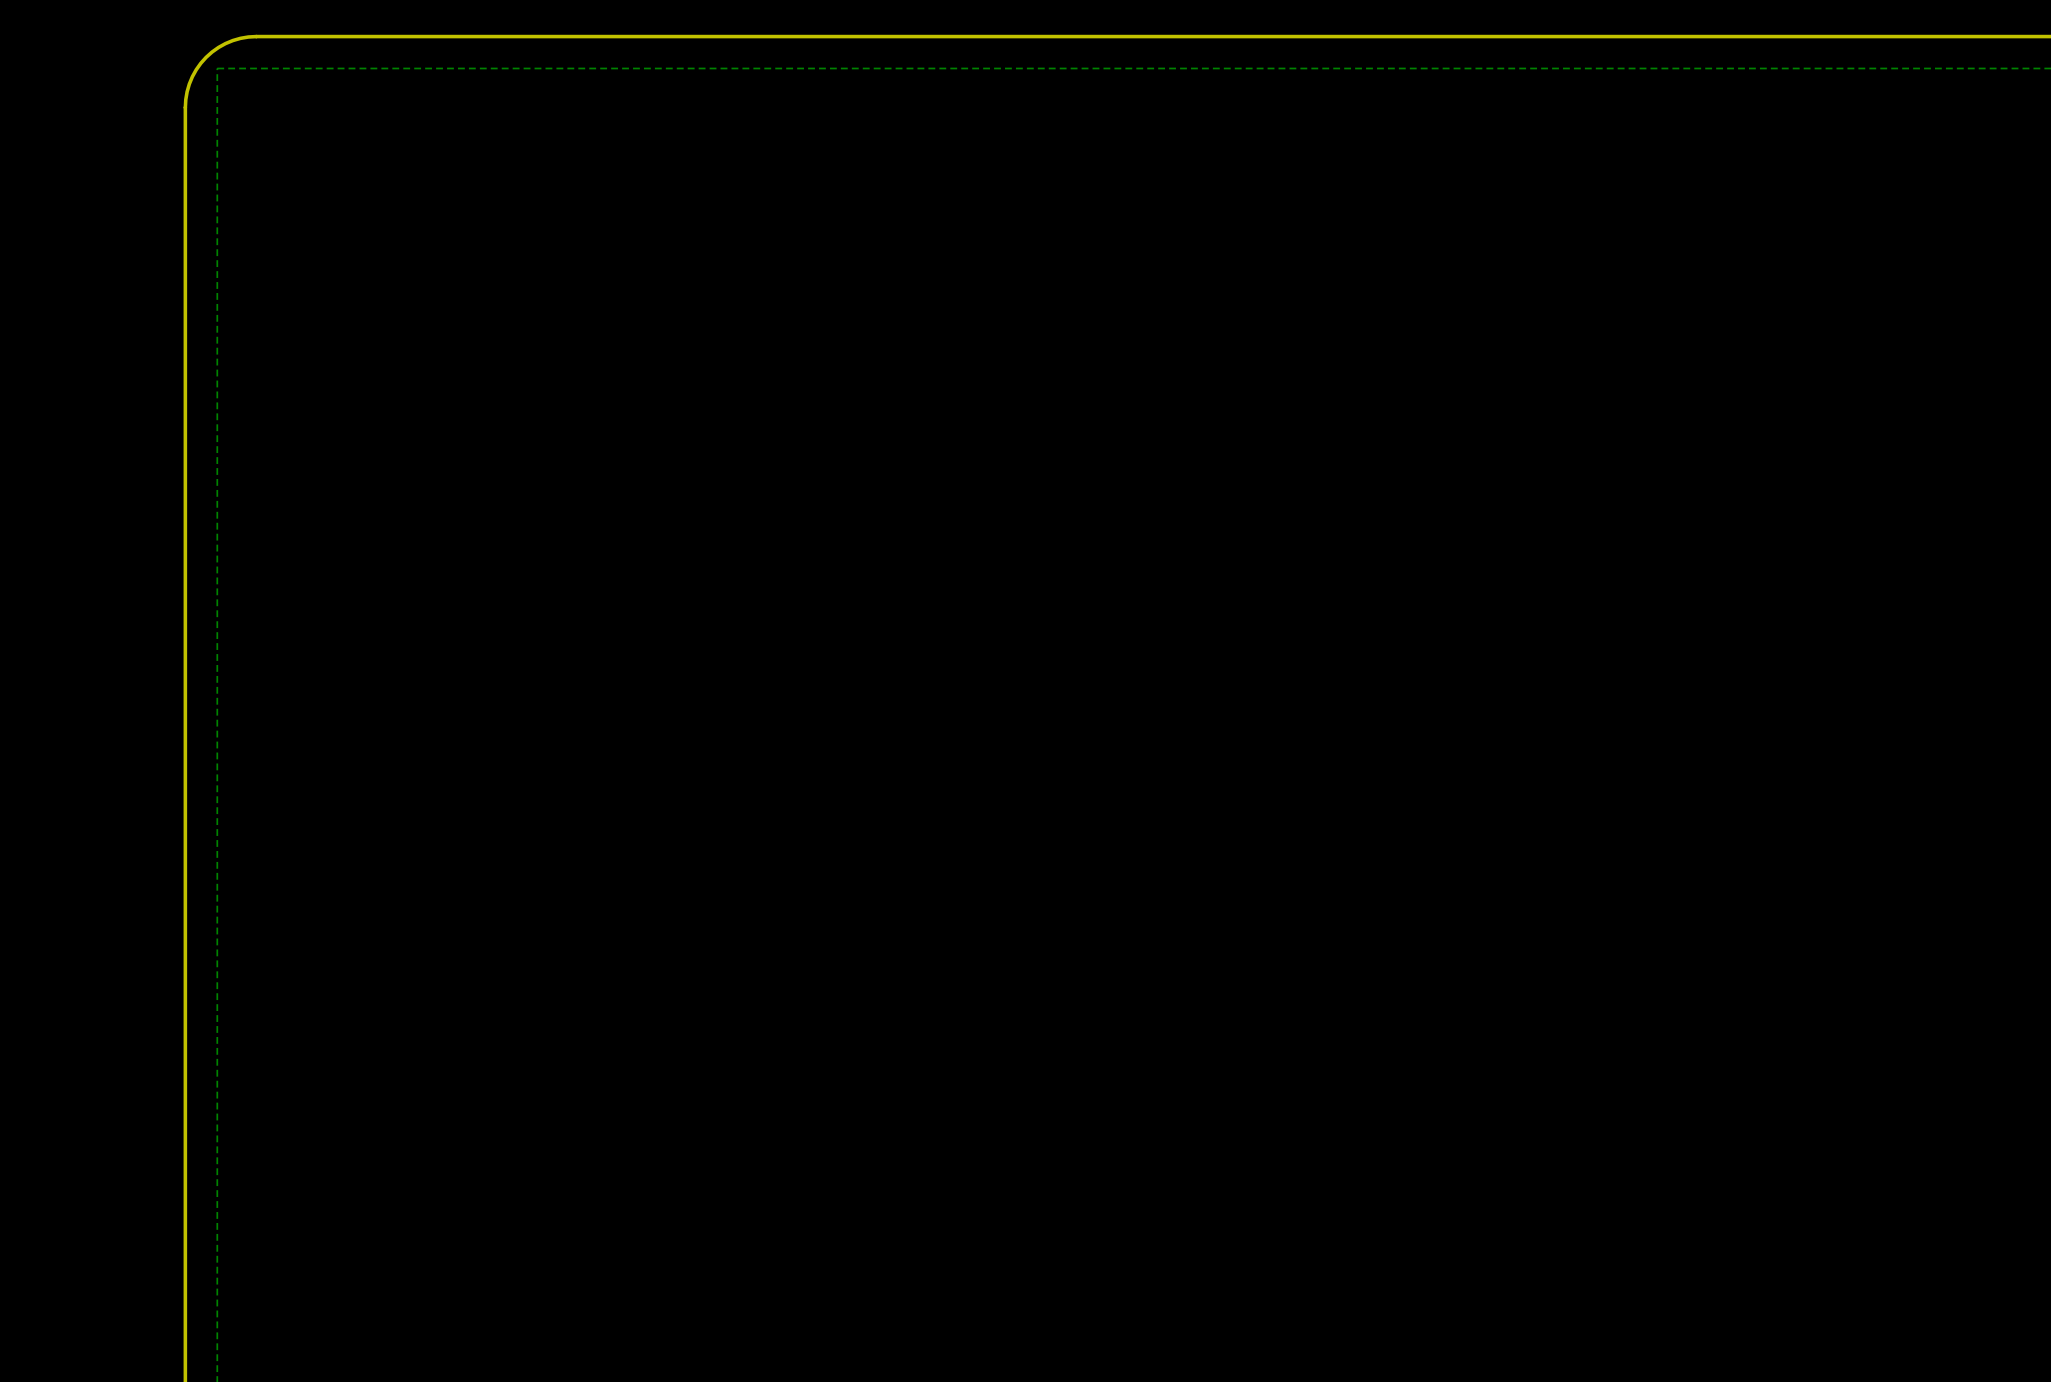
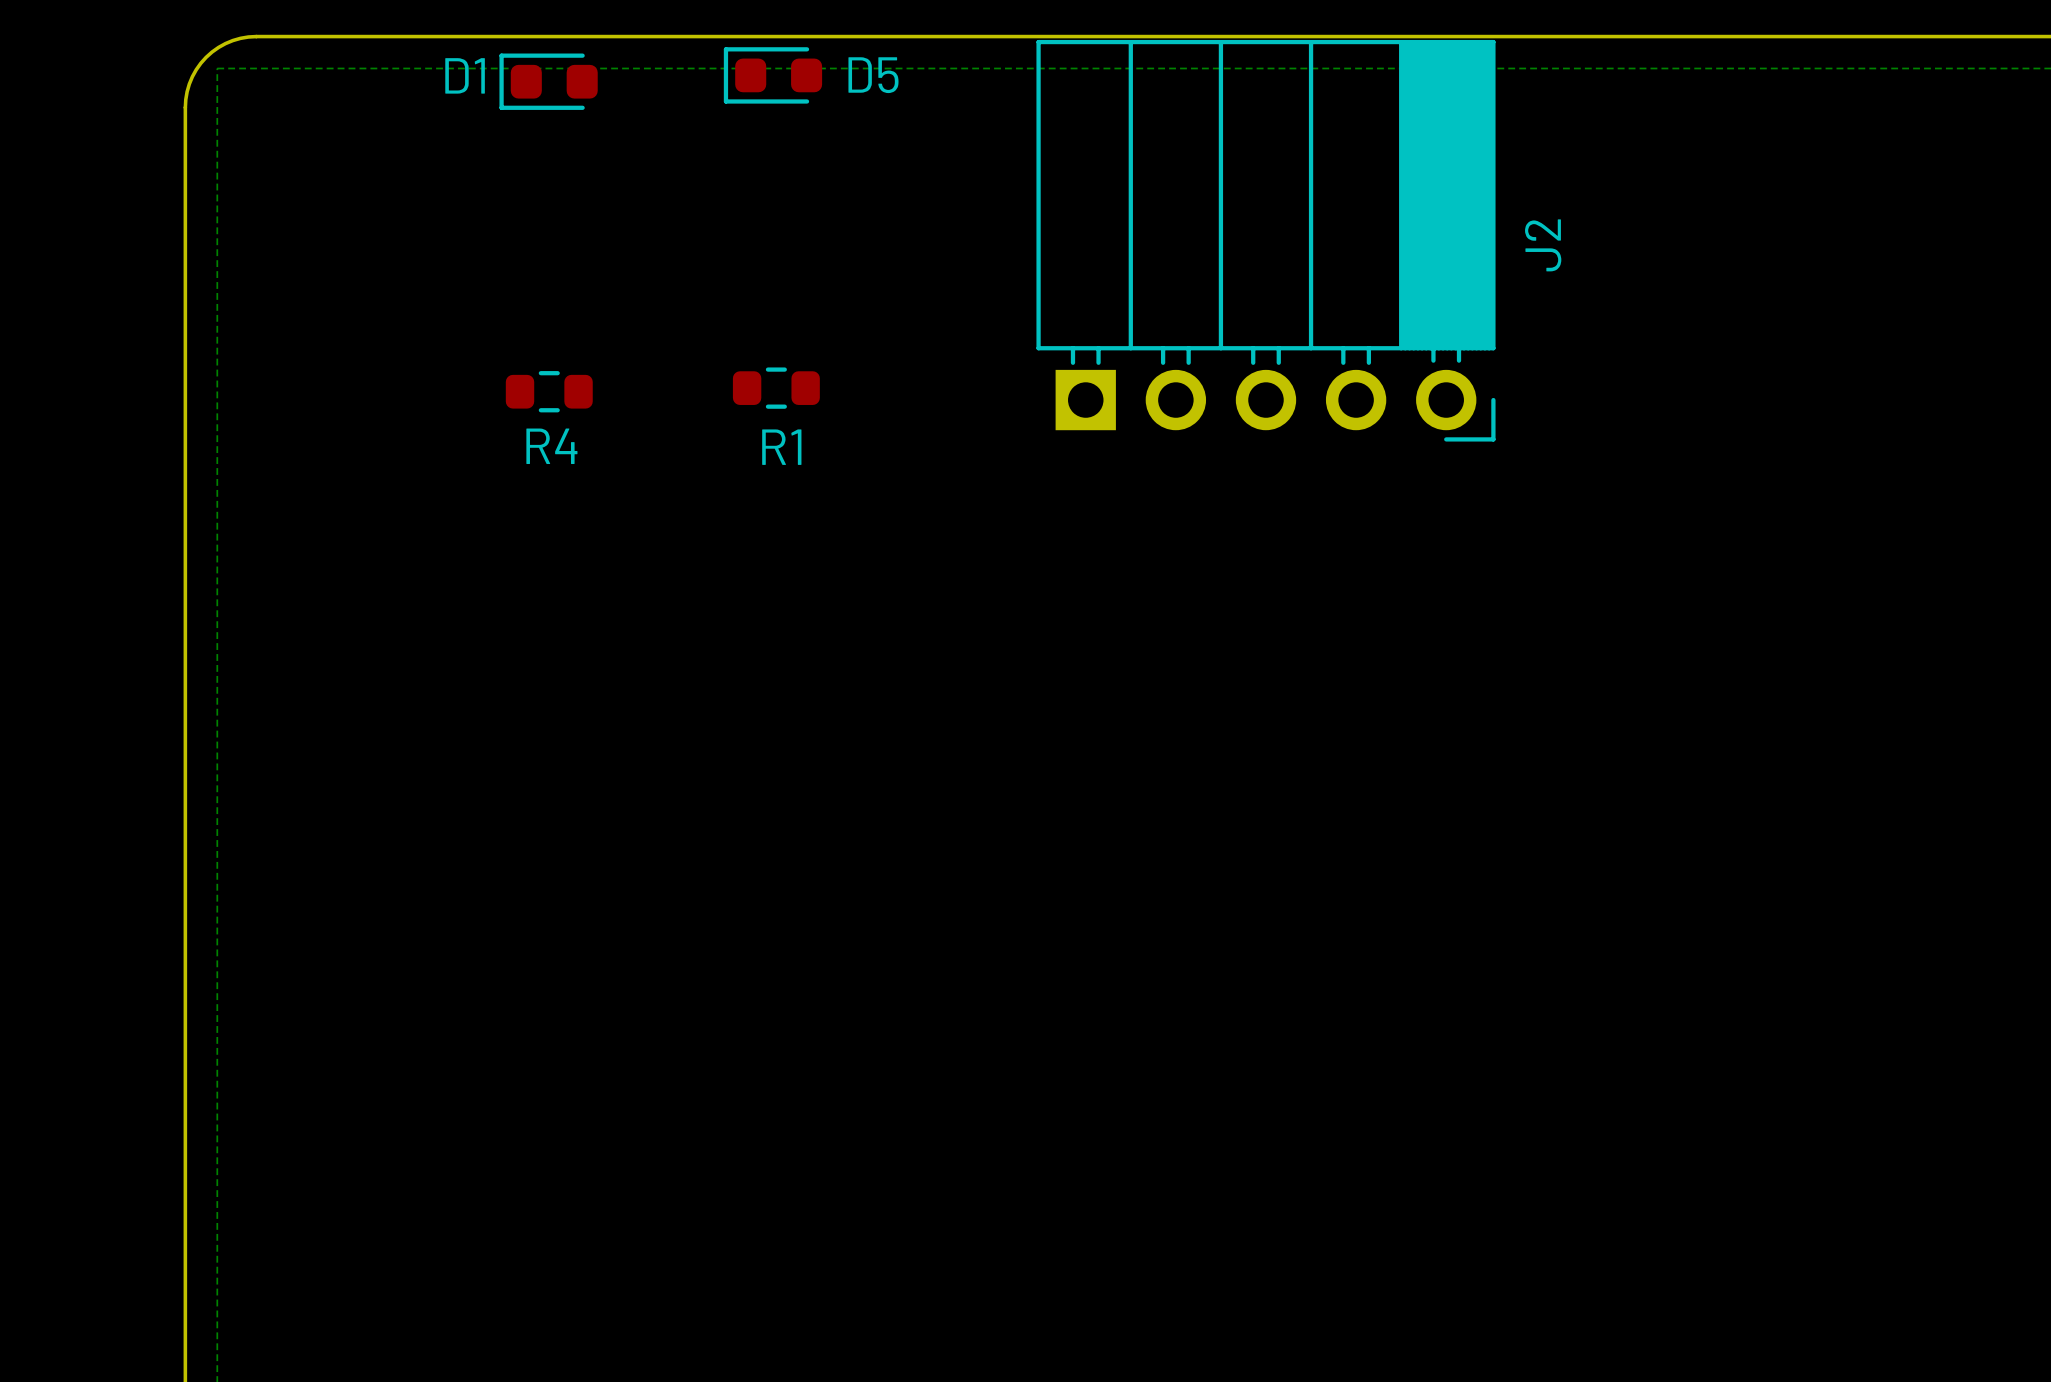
D5: none -> (772, 75)
D1: none -> (548, 81)
J2: none -> (1265, 240)
R1: none -> (776, 388)
R4: none -> (549, 391)

